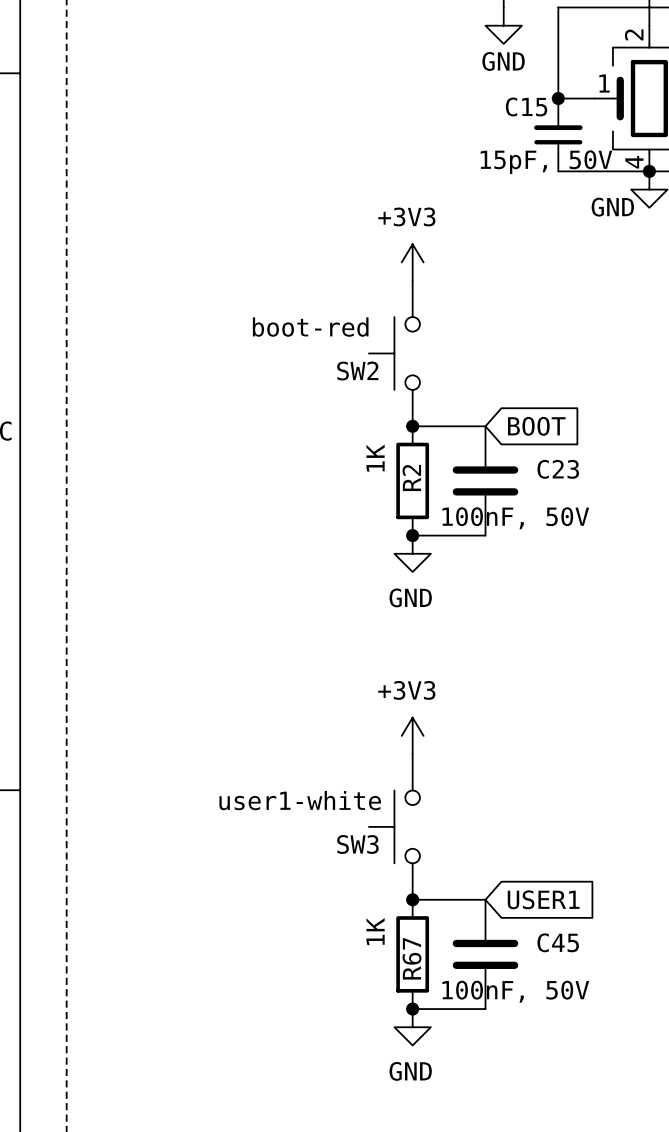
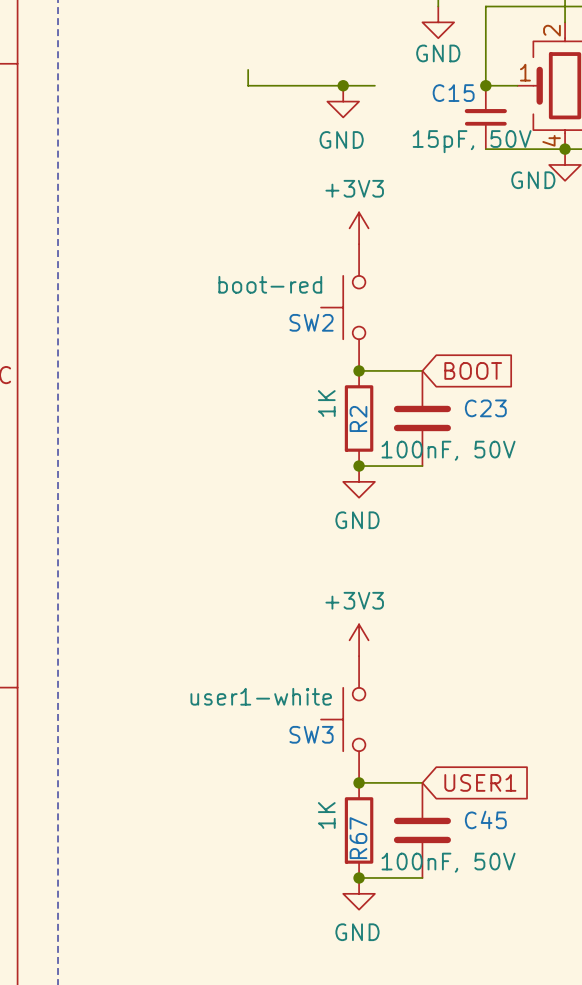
wire: none -> (248, 69) (248, 85) (374, 85)
junction: none -> (343, 85)
power symbol: none -> GND (343, 101)

